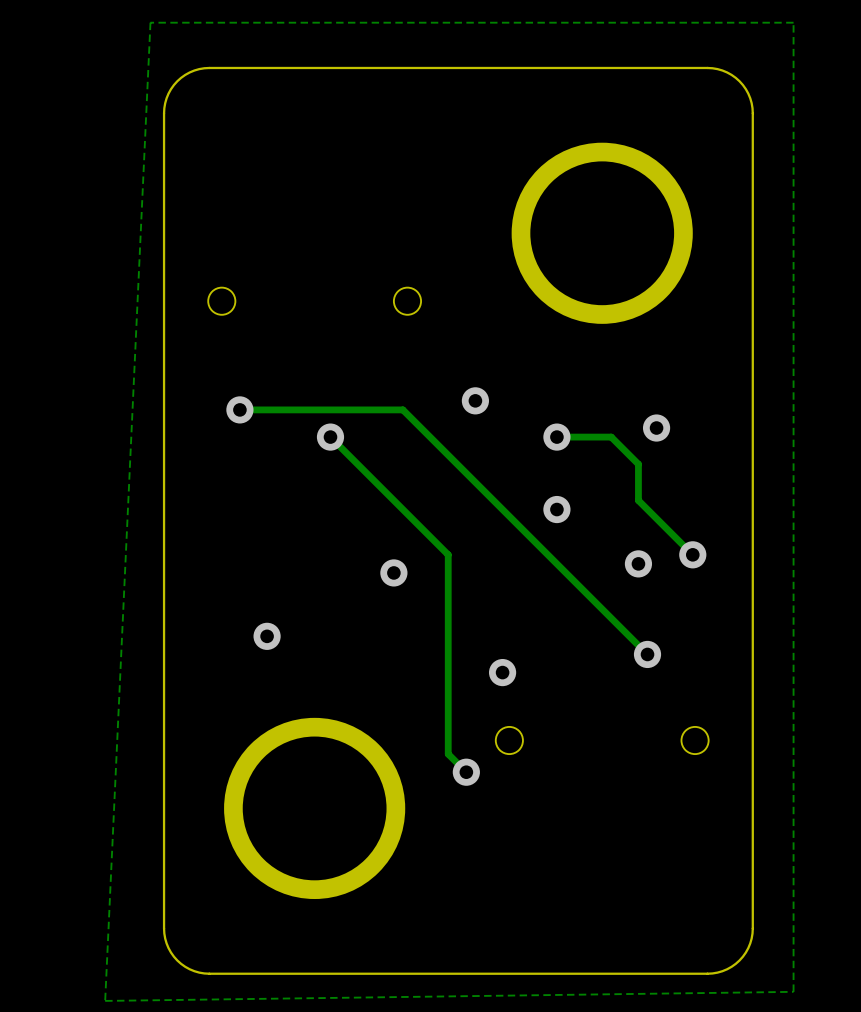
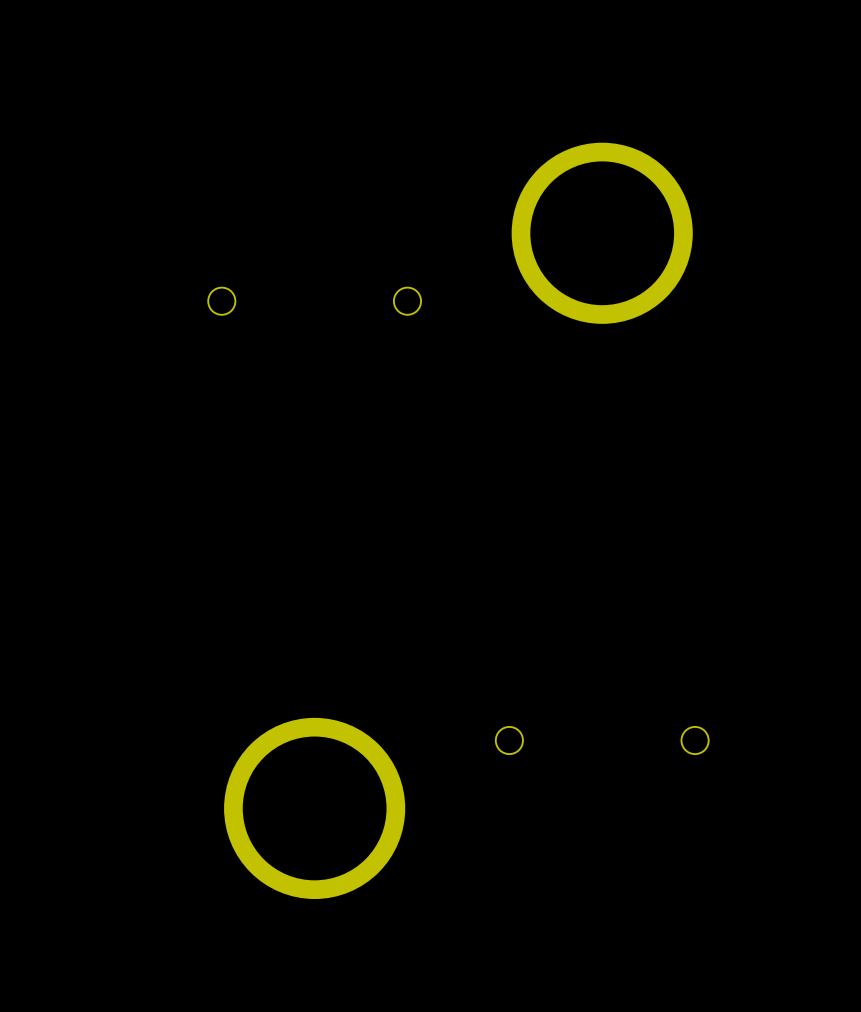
zone outline: (793, 22) (150, 22) (105, 1000) (793, 991) (793, 22) -> none
board edge: (707, 67) (209, 67) (189, 72) (177, 81) (170, 89) (165, 103) (164, 113) (164, 928) (165, 938) (170, 952) (185, 966) (199, 972) (209, 973) (707, 973) (717, 972) (731, 966) (745, 952) (751, 938) (752, 928) (752, 113) (750, 98) (739, 81) (727, 72) (707, 67) -> none
via: (475, 400) -> none
track: (239, 409) (402, 409) (647, 654) -> none
via: (239, 409) -> none
via: (656, 428) -> none
track: (330, 437) (448, 554) (448, 754) (466, 772) -> none
via: (330, 437) -> none
track: (556, 437) (611, 437) (638, 464) (638, 500) (692, 554) -> none
via: (556, 437) -> none
via: (556, 509) -> none
via: (692, 554) -> none
via: (638, 563) -> none
via: (393, 572) -> none
via: (267, 636) -> none
via: (647, 654) -> none
via: (502, 672) -> none
via: (466, 772) -> none

